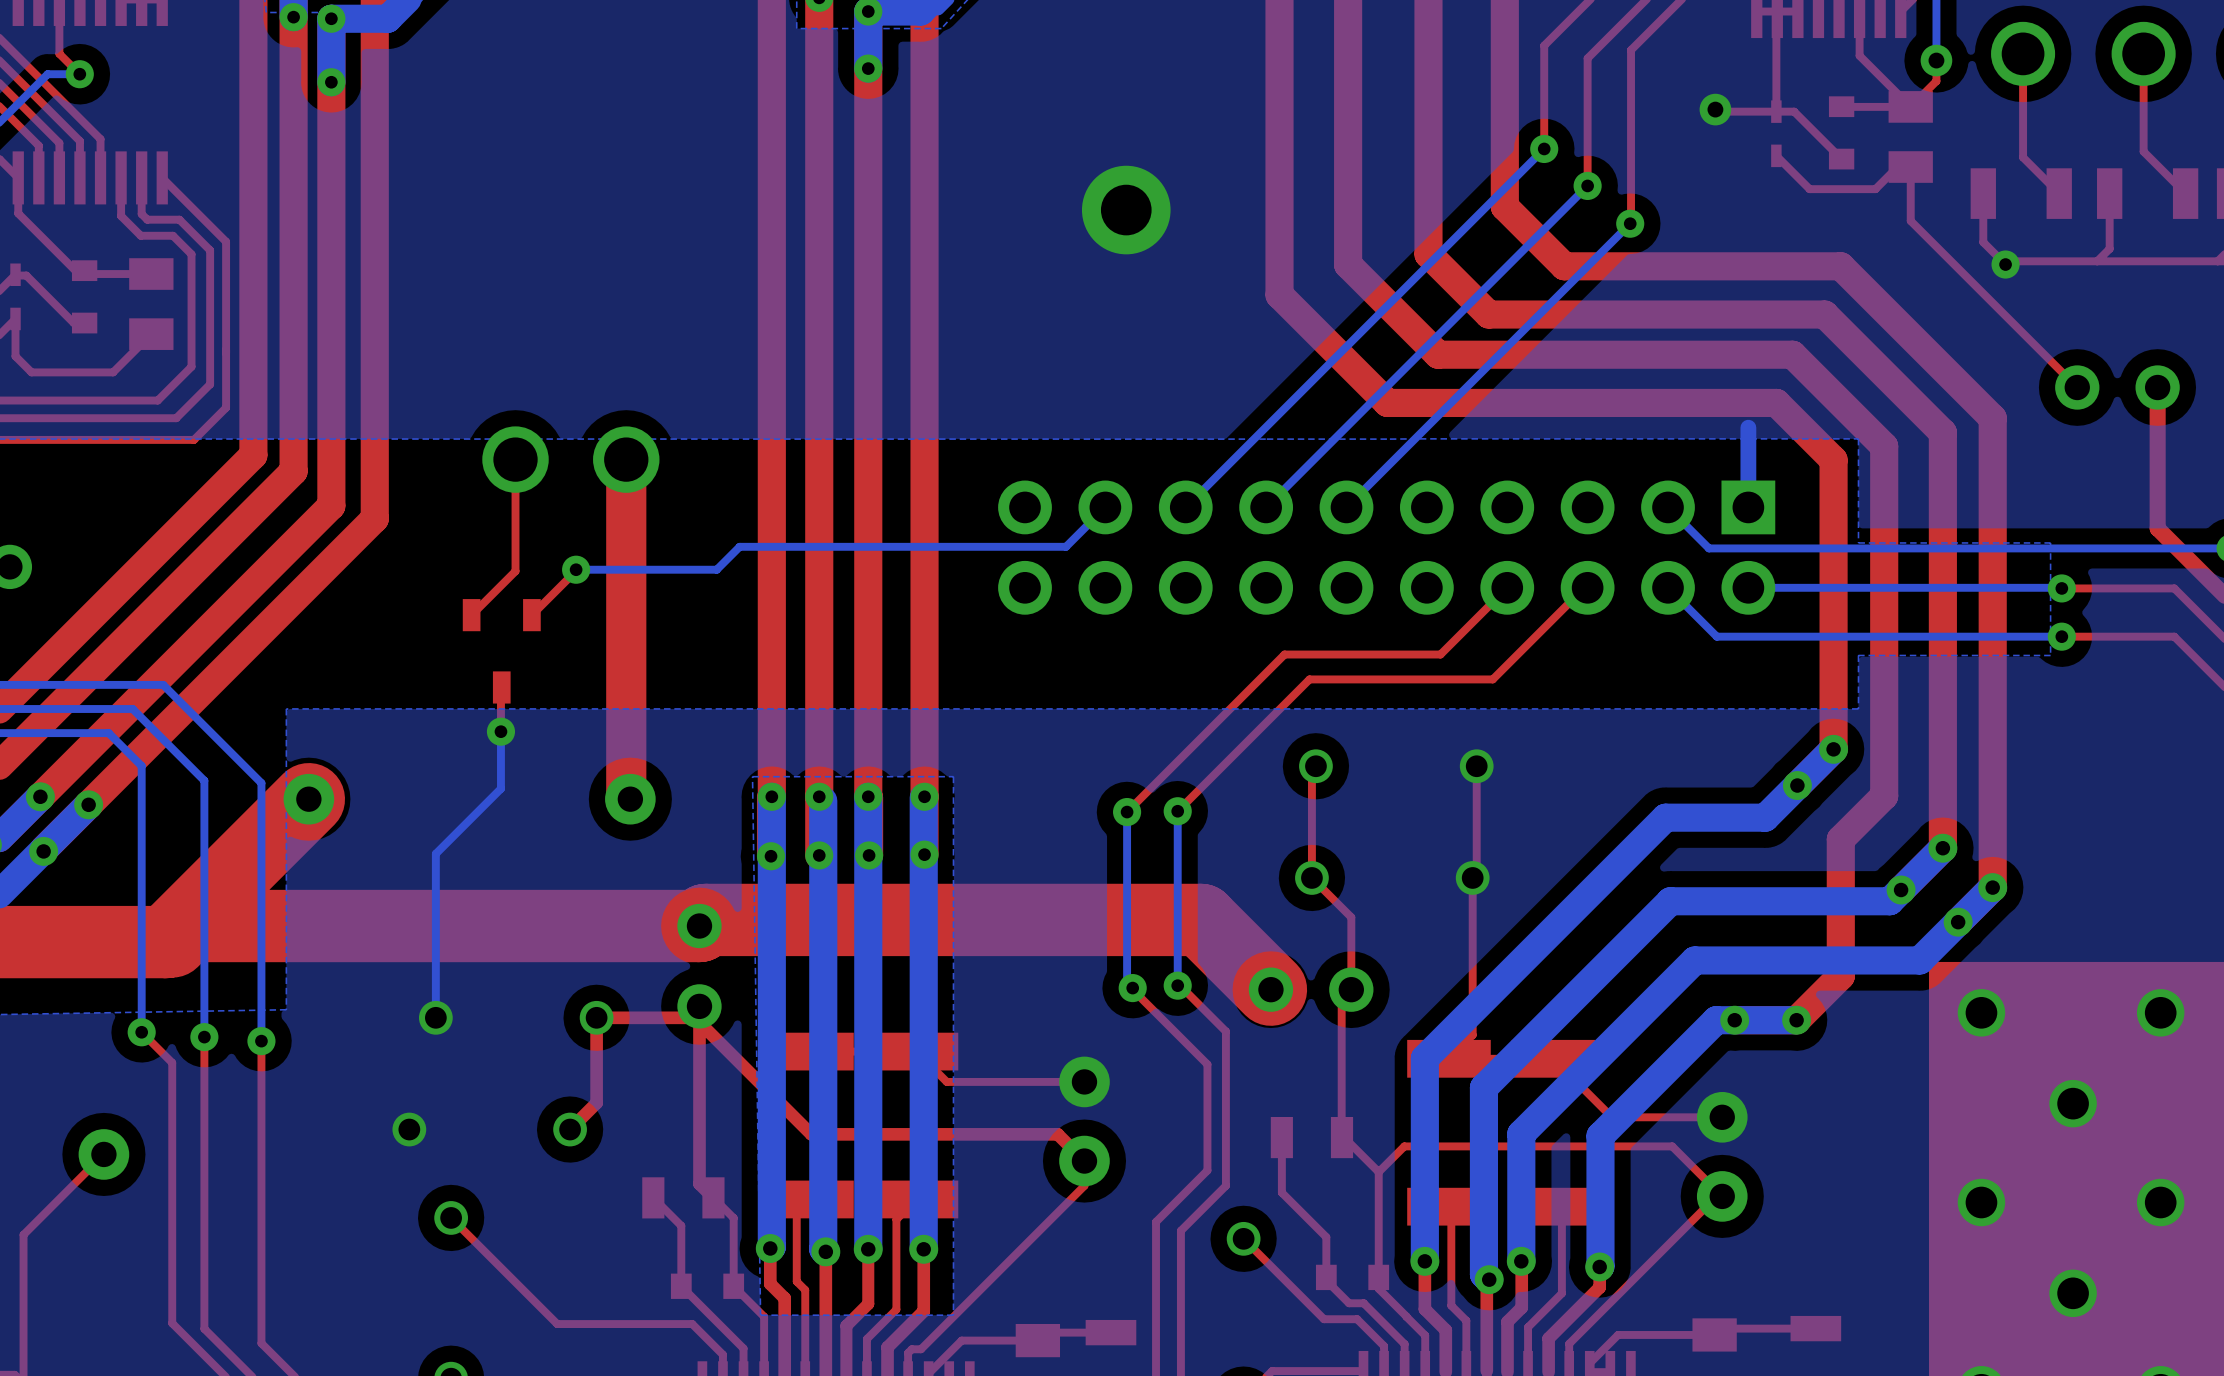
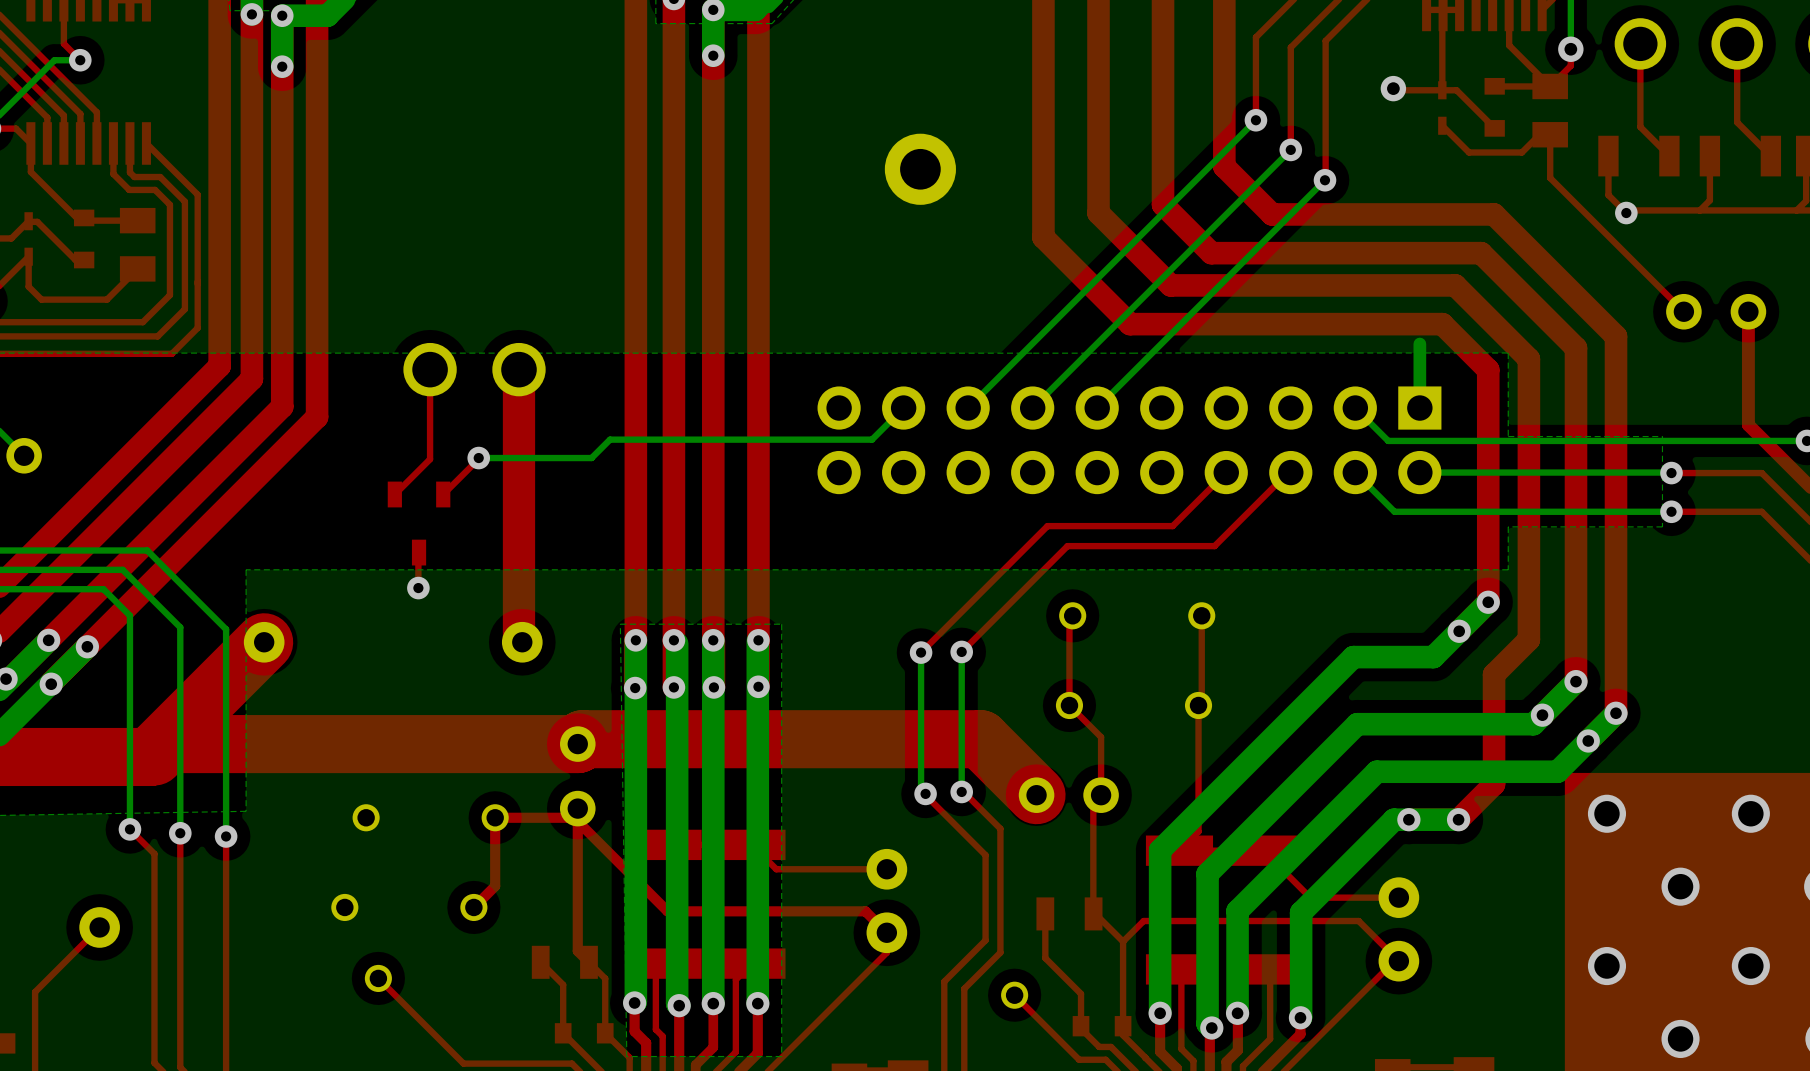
bottom track: (500, 731) (500, 788) (435, 853) (435, 1017) -> none

